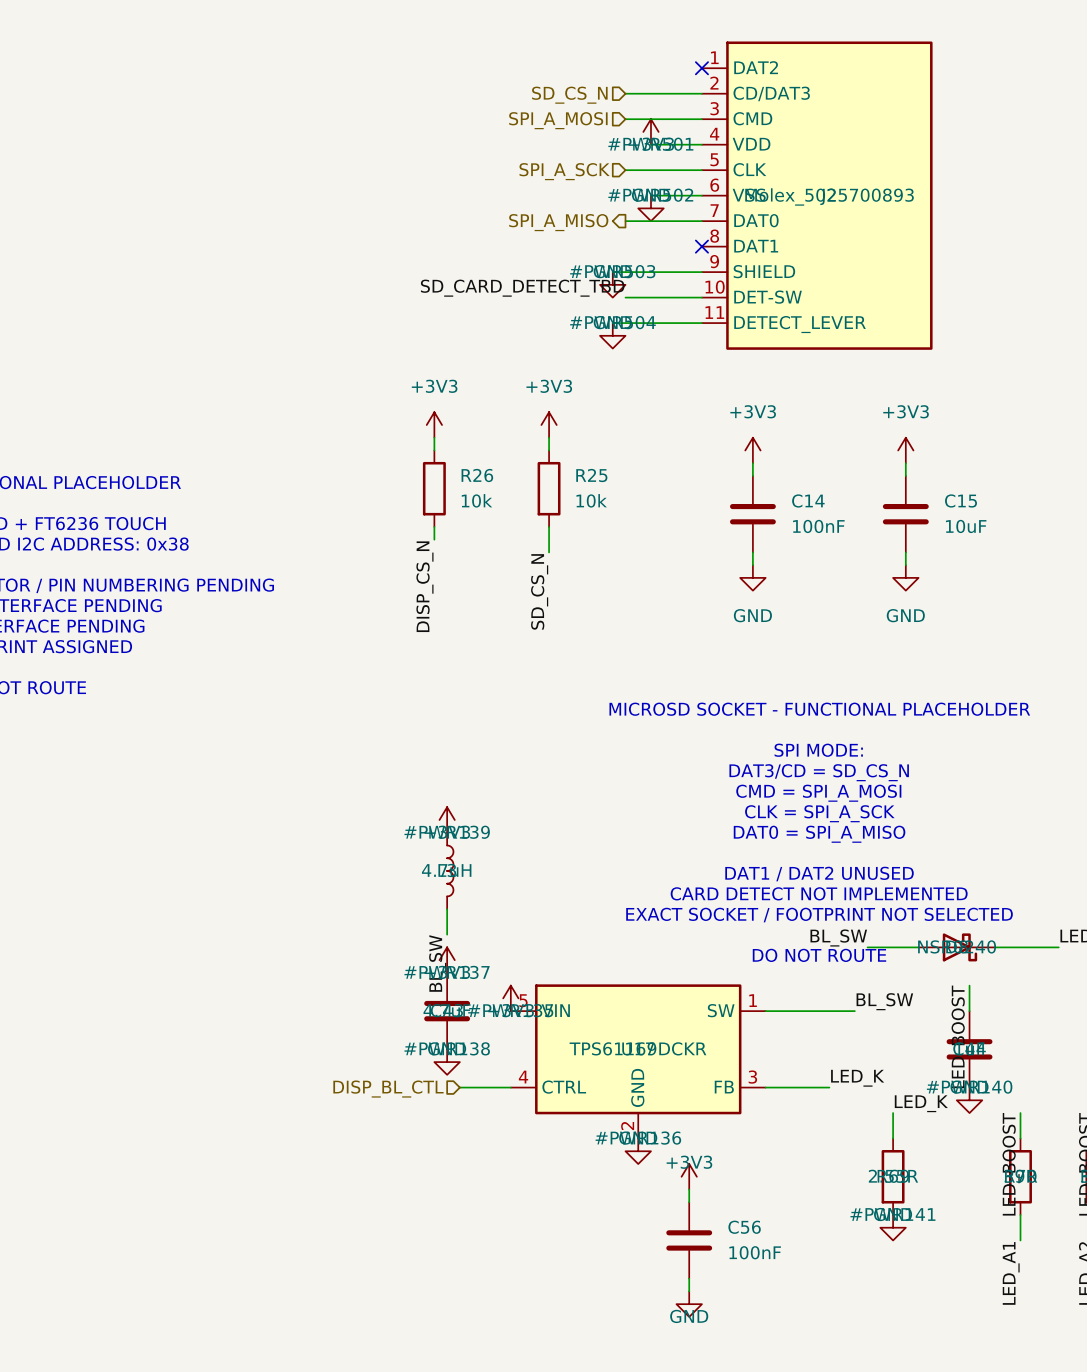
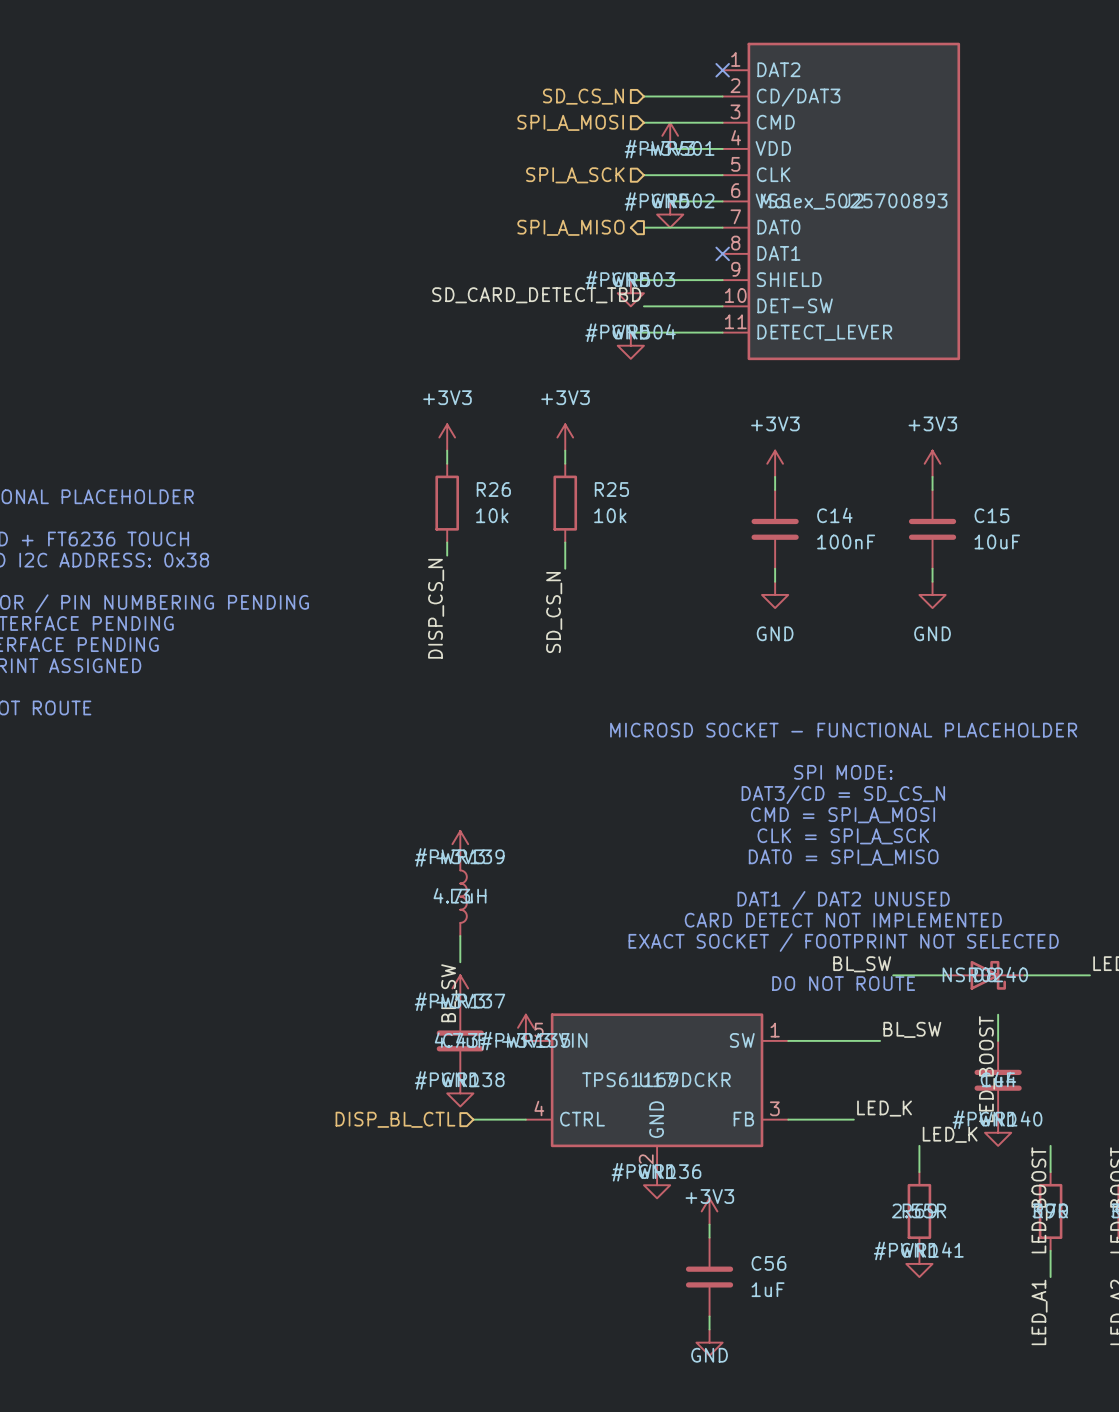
C56 value: 100nF (755, 1252) -> 1uF (768, 1289)

